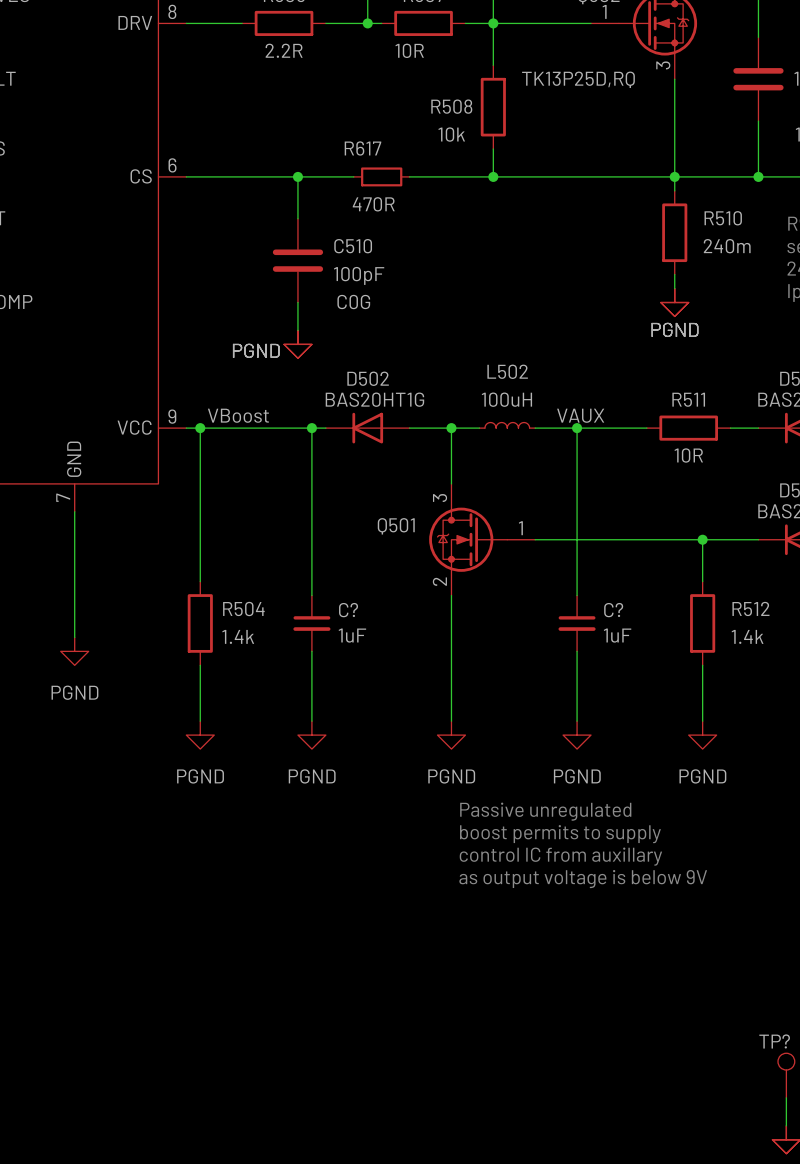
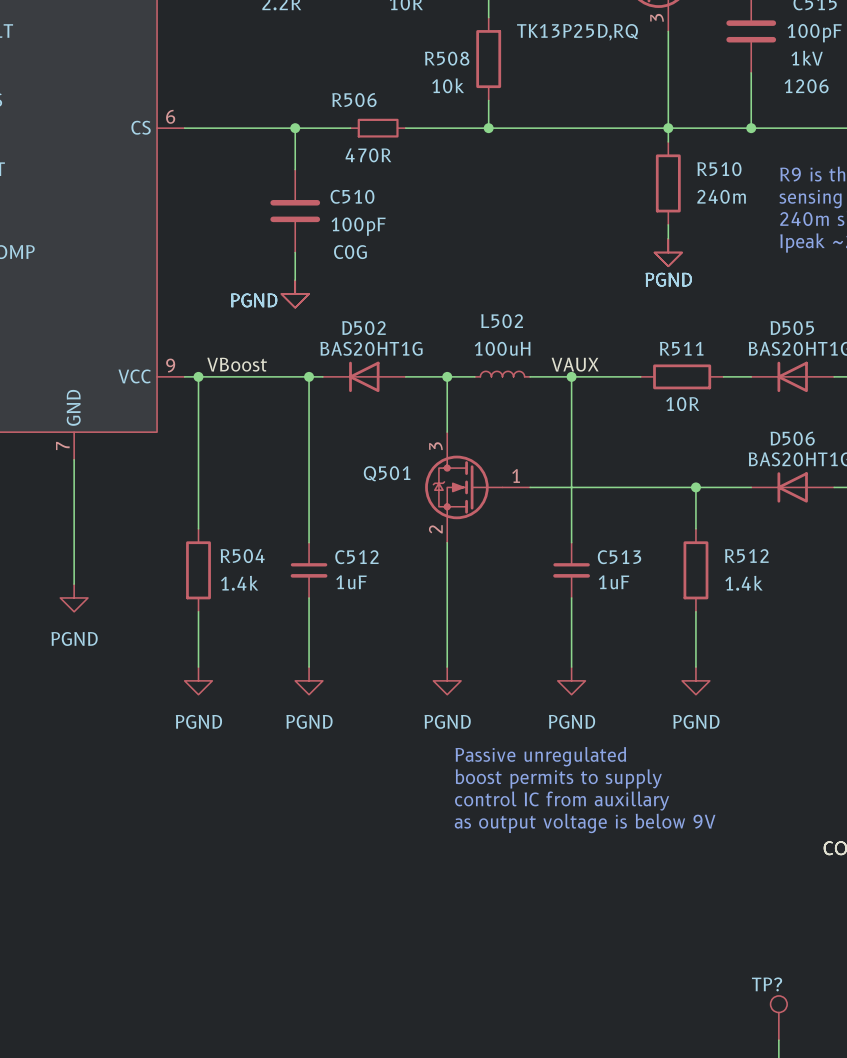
R617 name: R617 (362, 148) -> R506 (354, 100)
C? name: C? (348, 610) -> C512 (356, 557)
C? name: C? (613, 610) -> C513 (619, 557)

